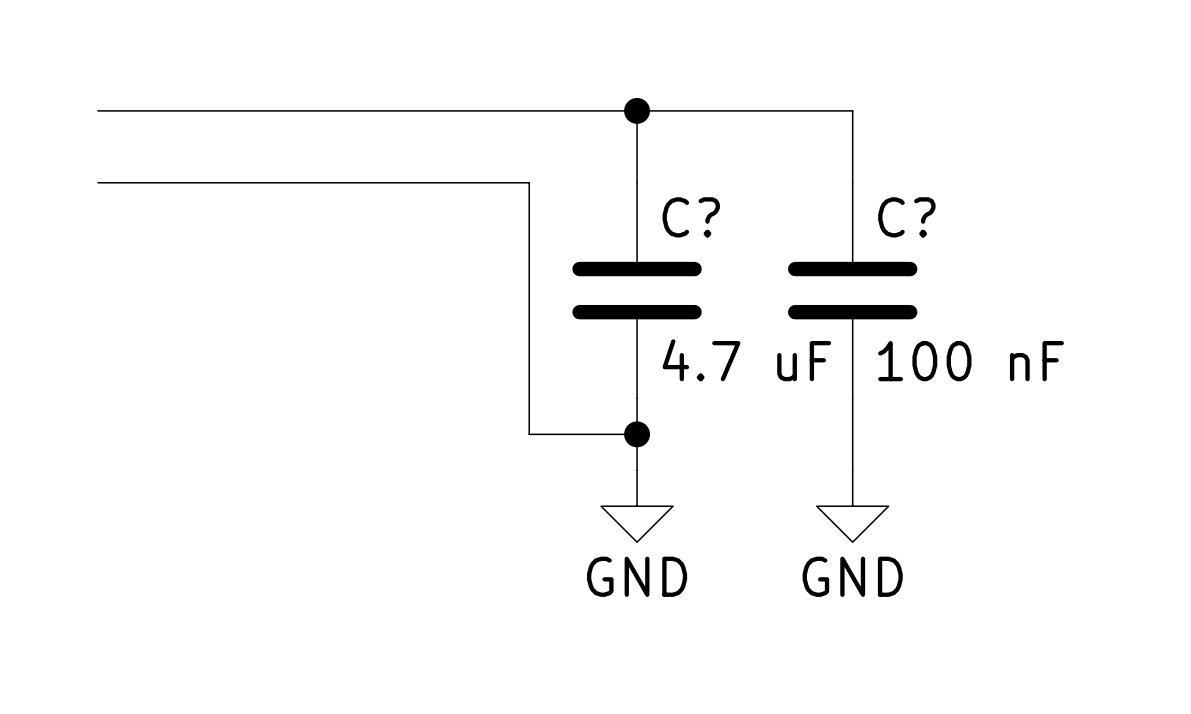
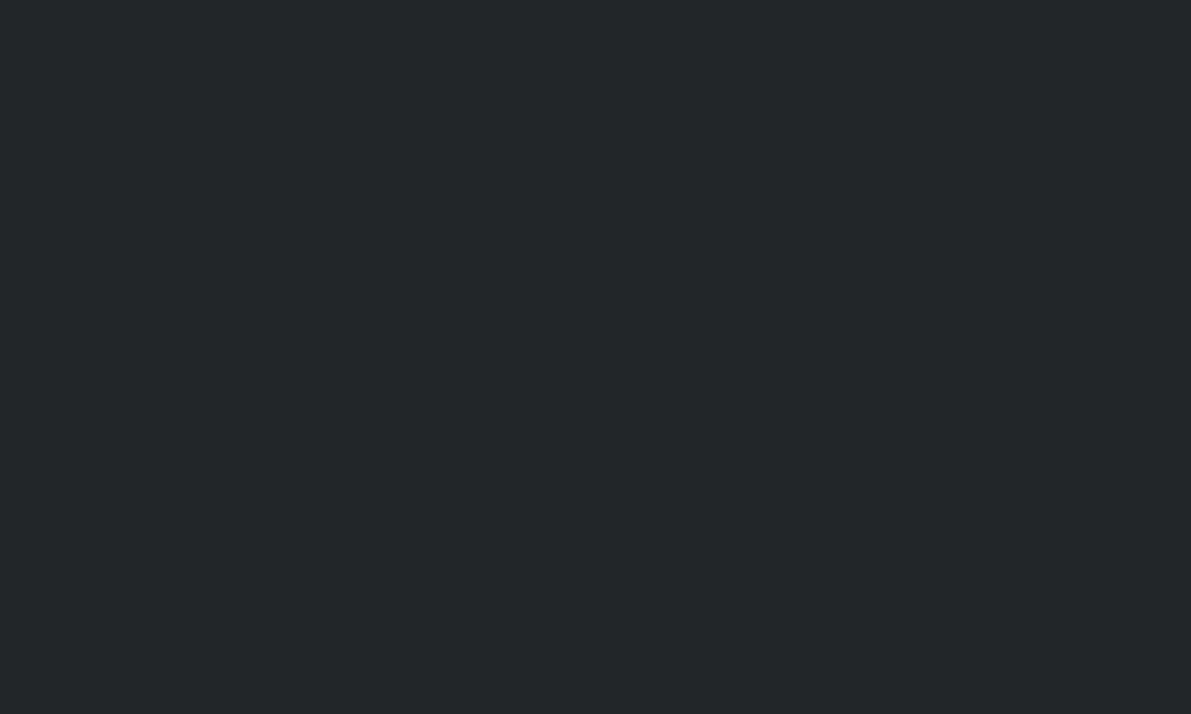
wire: (97, 110) (852, 110) (852, 182) -> none
wire: (637, 110) (637, 182) -> none
junction: (637, 110) -> none
wire: (97, 182) (529, 182) (529, 434) (637, 434) -> none
C?: 4.7 uF (637, 290) -> none
C?: 100 nF (852, 290) -> none
wire: (637, 398) (637, 470) -> none
wire: (852, 398) (852, 470) -> none
junction: (637, 434) -> none
power symbol: GND (637, 506) -> none
power symbol: GND (852, 506) -> none

